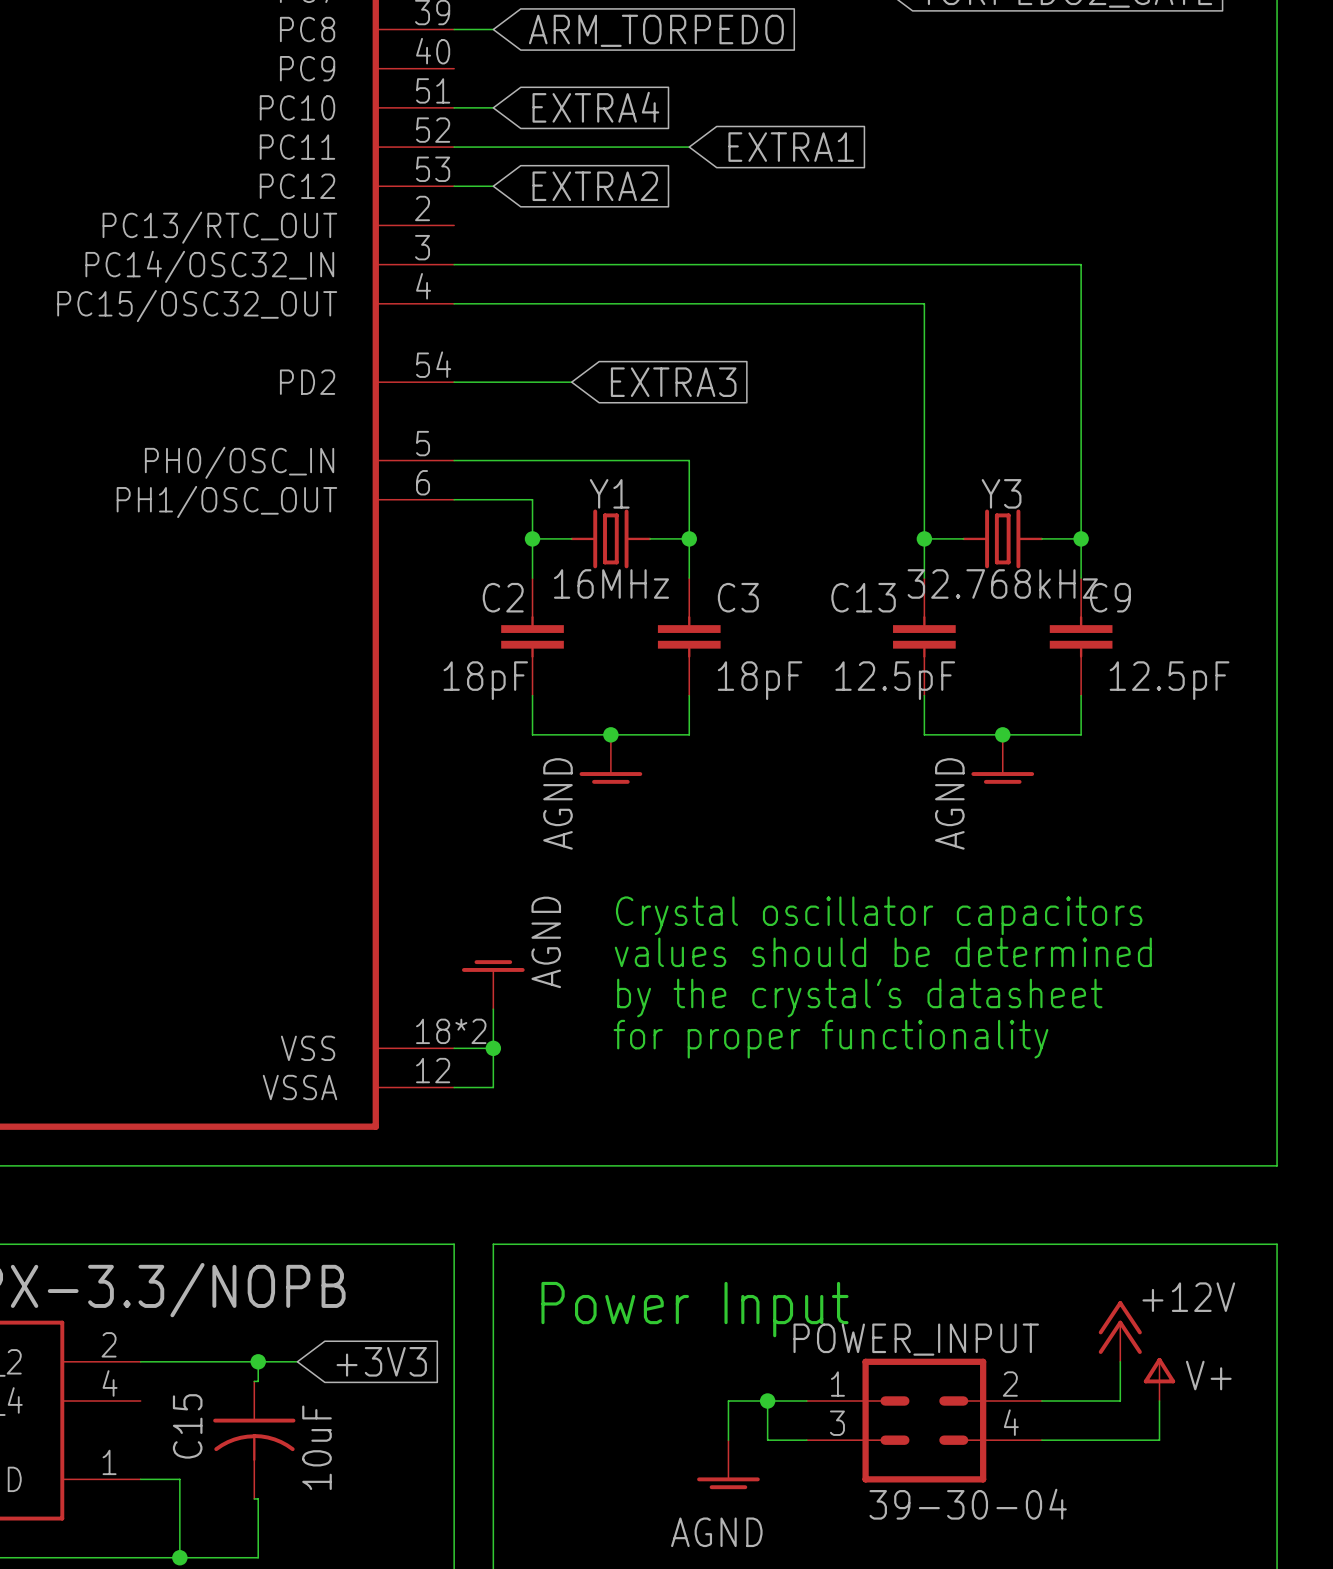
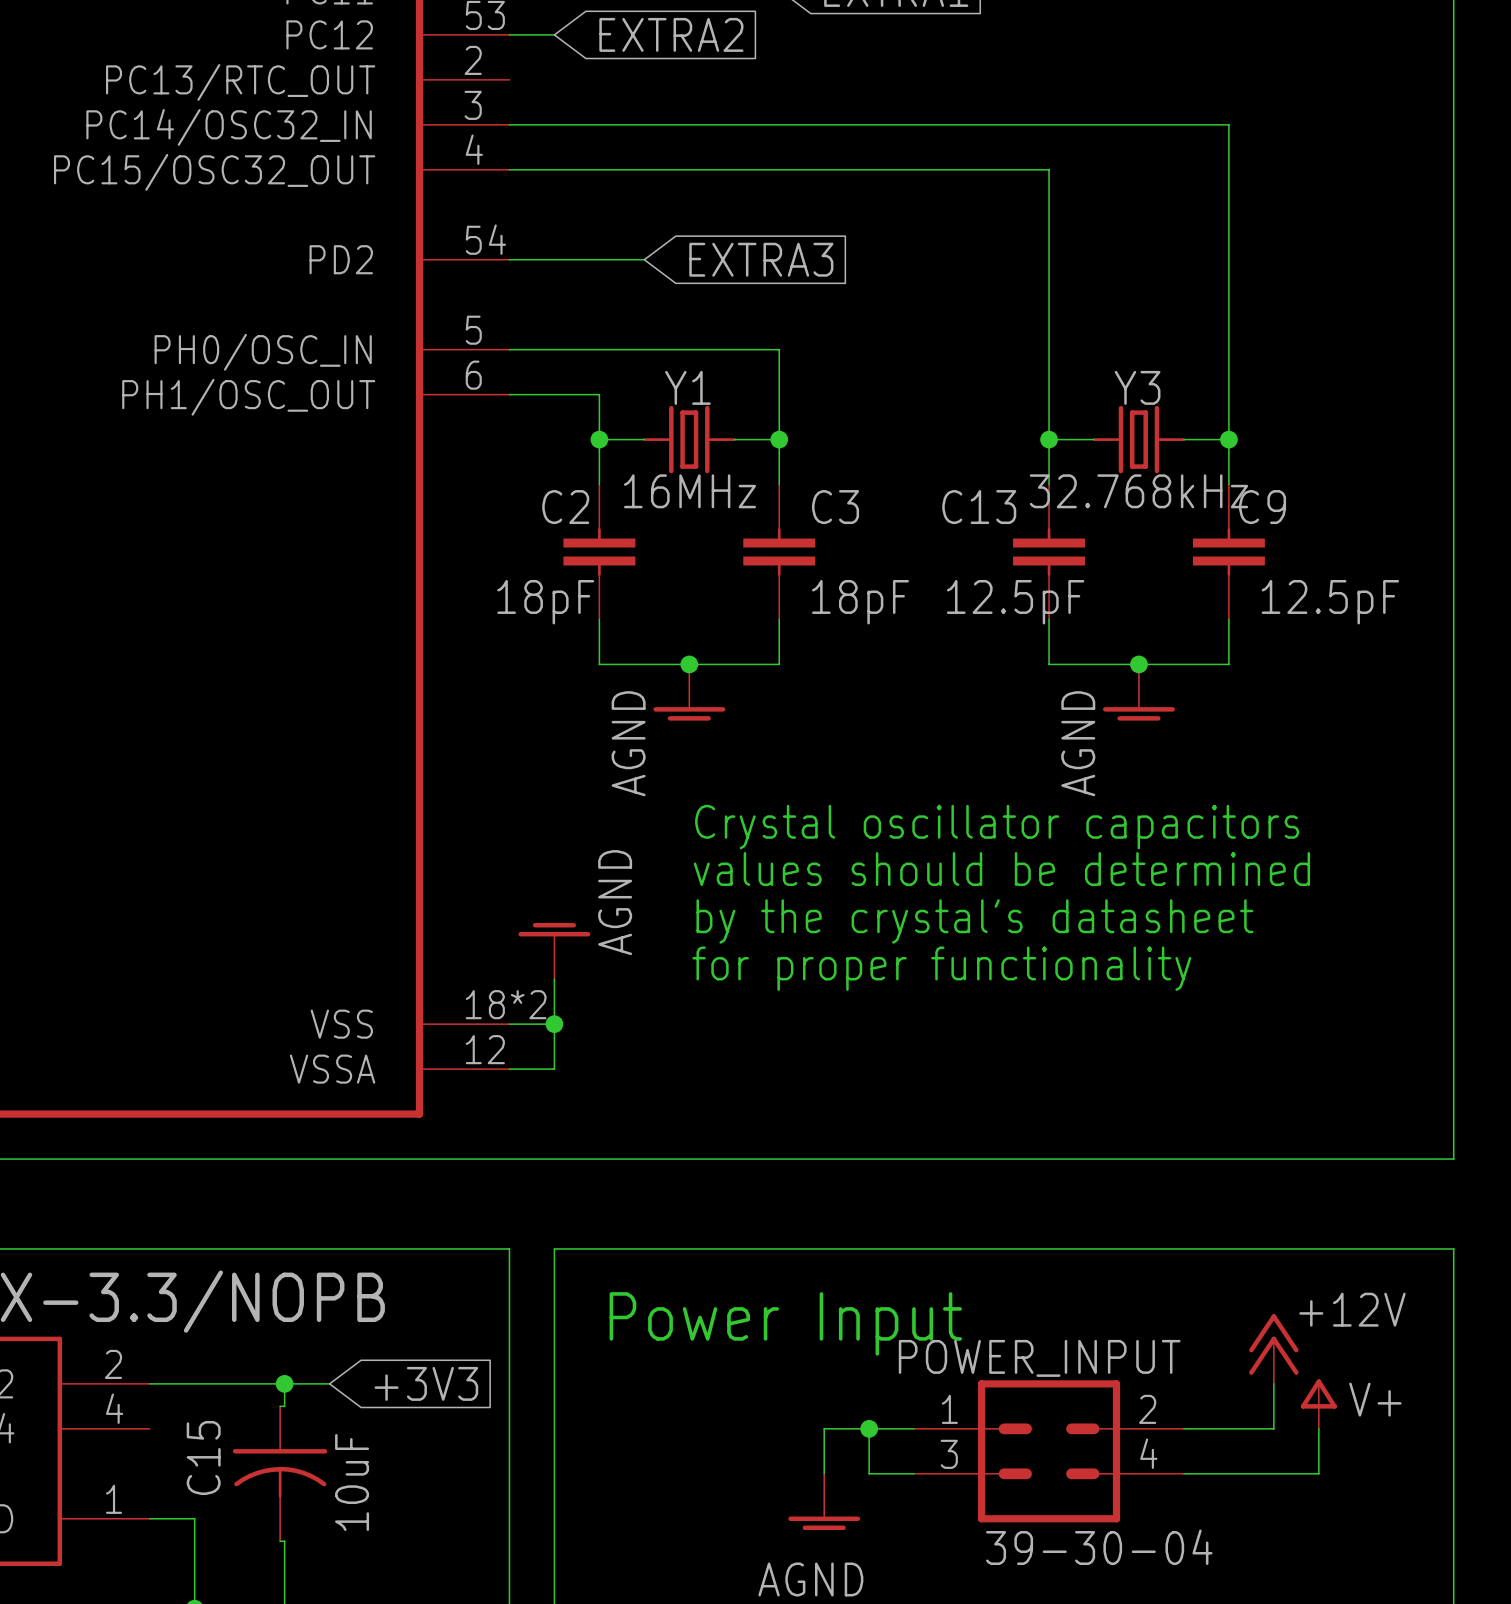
text position: Crystal oscillator capacitors (879, 915) -> Crystal oscillator capacitors (997, 827)
text position: values should be determined (883, 952) -> values should be determined (1001, 869)
text position: by the crystal's datasheet (859, 998) -> by the crystal's datasheet (974, 921)
text position: for proper functionality (830, 1039) -> for proper functionality (941, 968)

